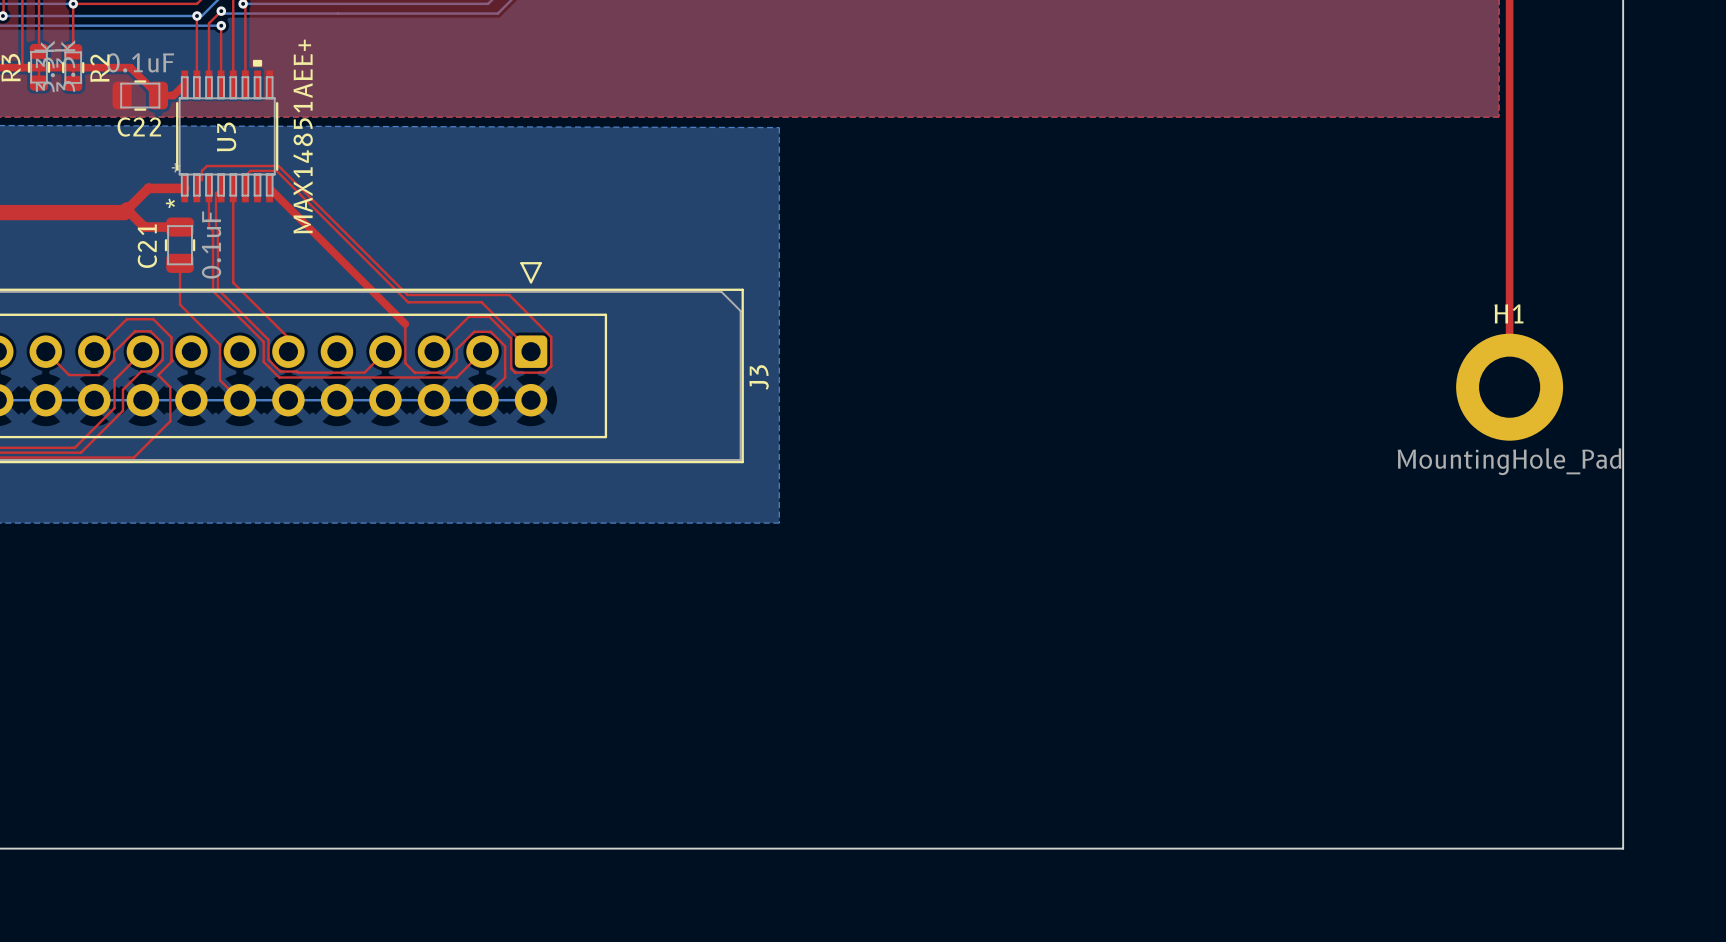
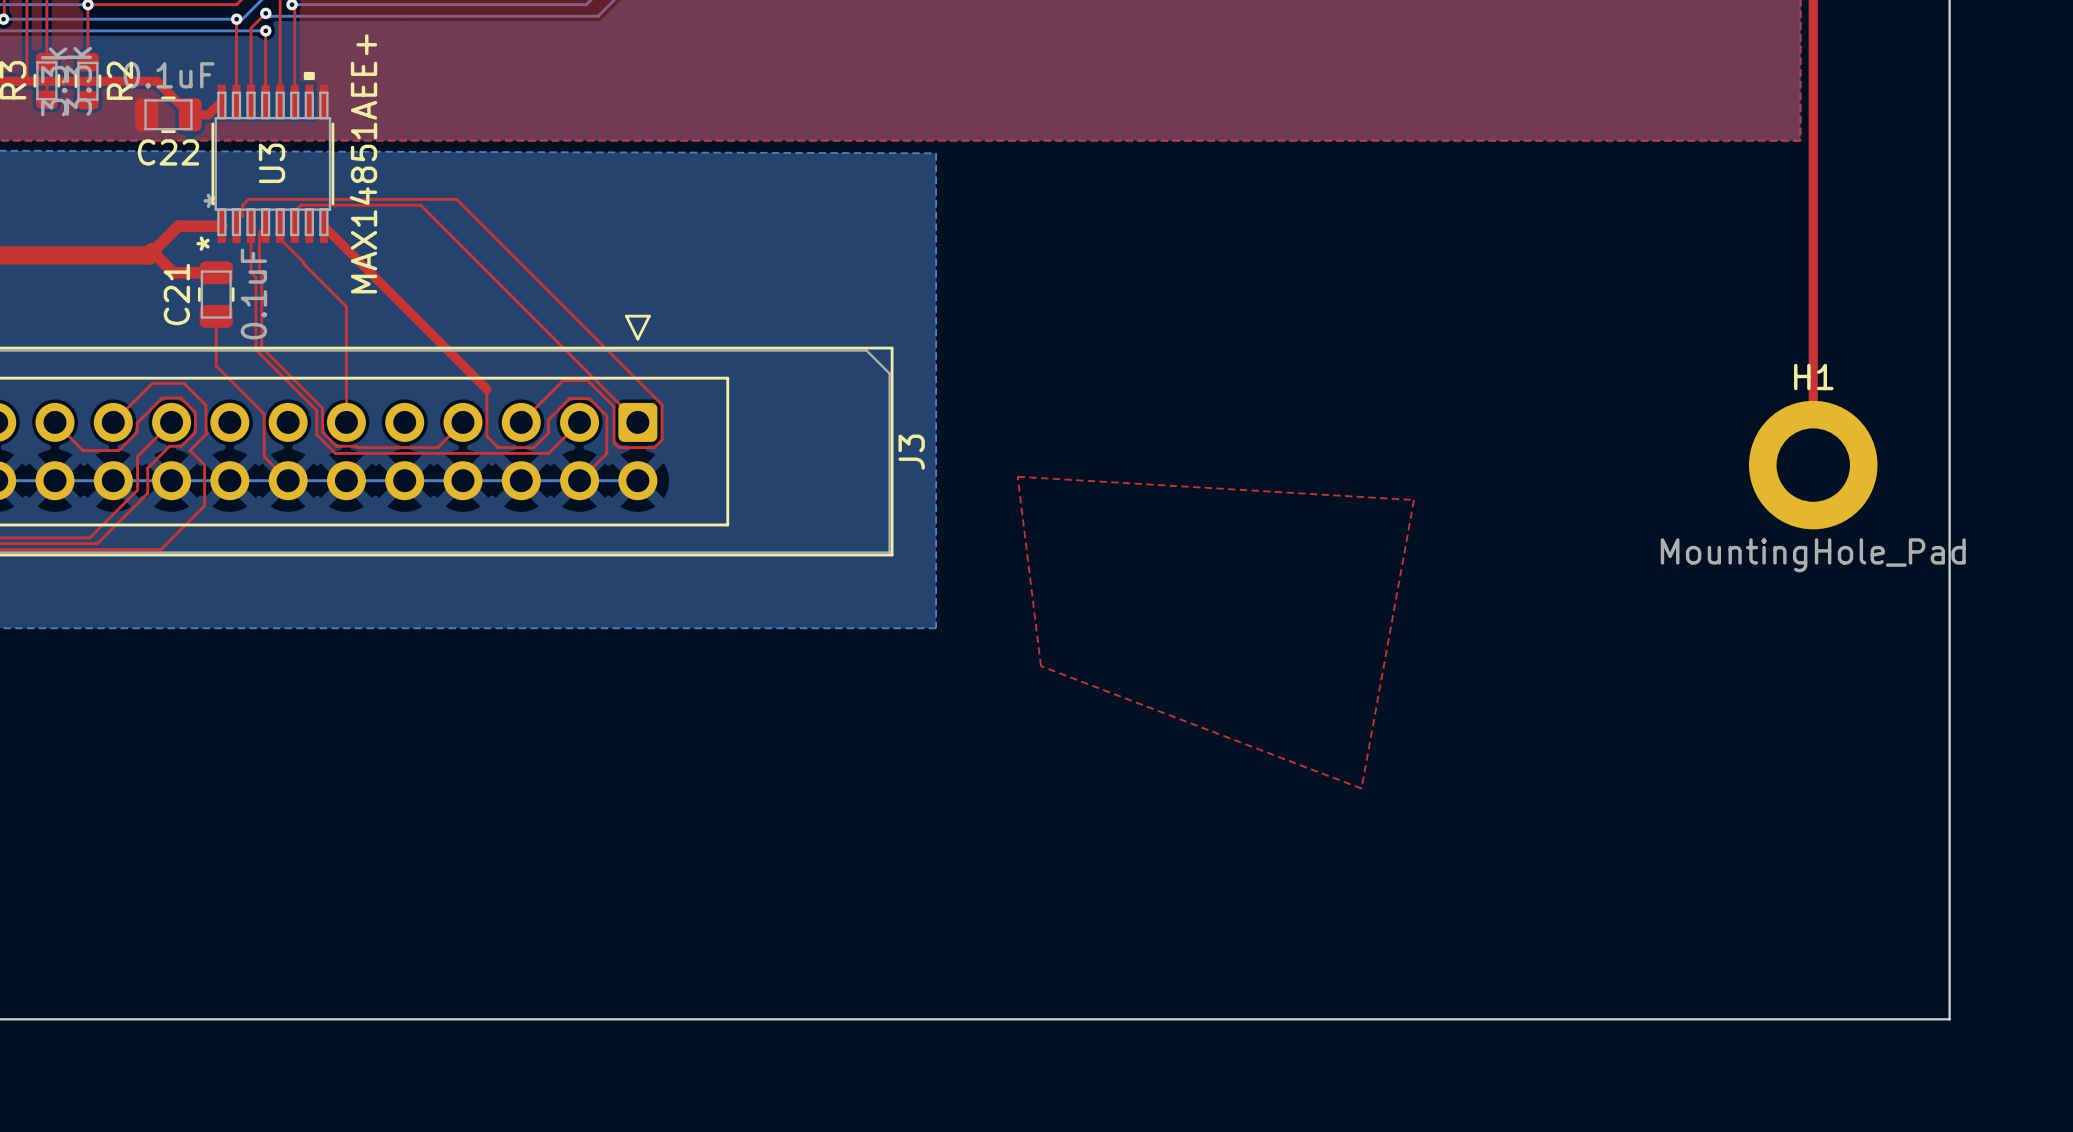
top track: (278, 166) (407, 295) (509, 295) -> (334, 199) (456, 199) (611, 354)
top track: (276, 170) (408, 302) (481, 302) -> (332, 205) (420, 205) (578, 363)
top track: (233, 198) (233, 282) (288, 337) -> (280, 238) (346, 306) (346, 405)
top zone outline: none -> (1017, 476) (1040, 666) (1361, 788) (1414, 500) (1017, 476)

